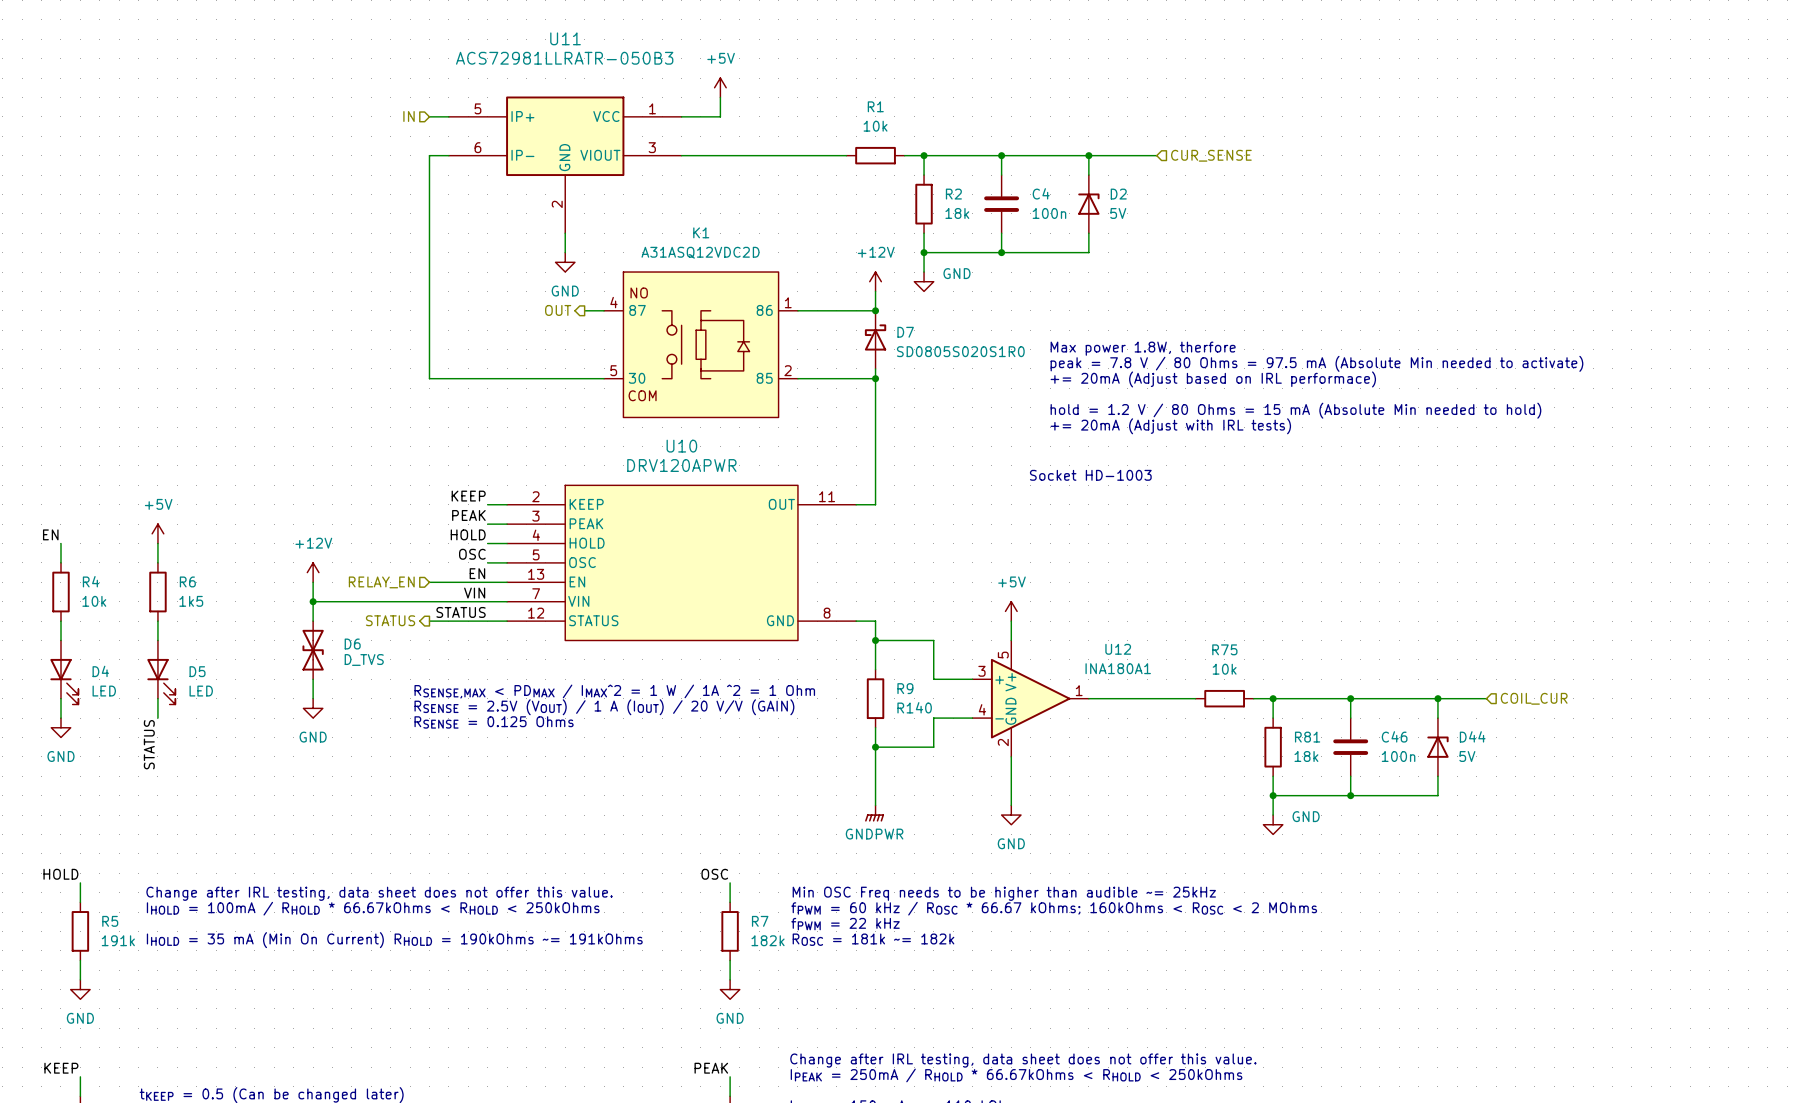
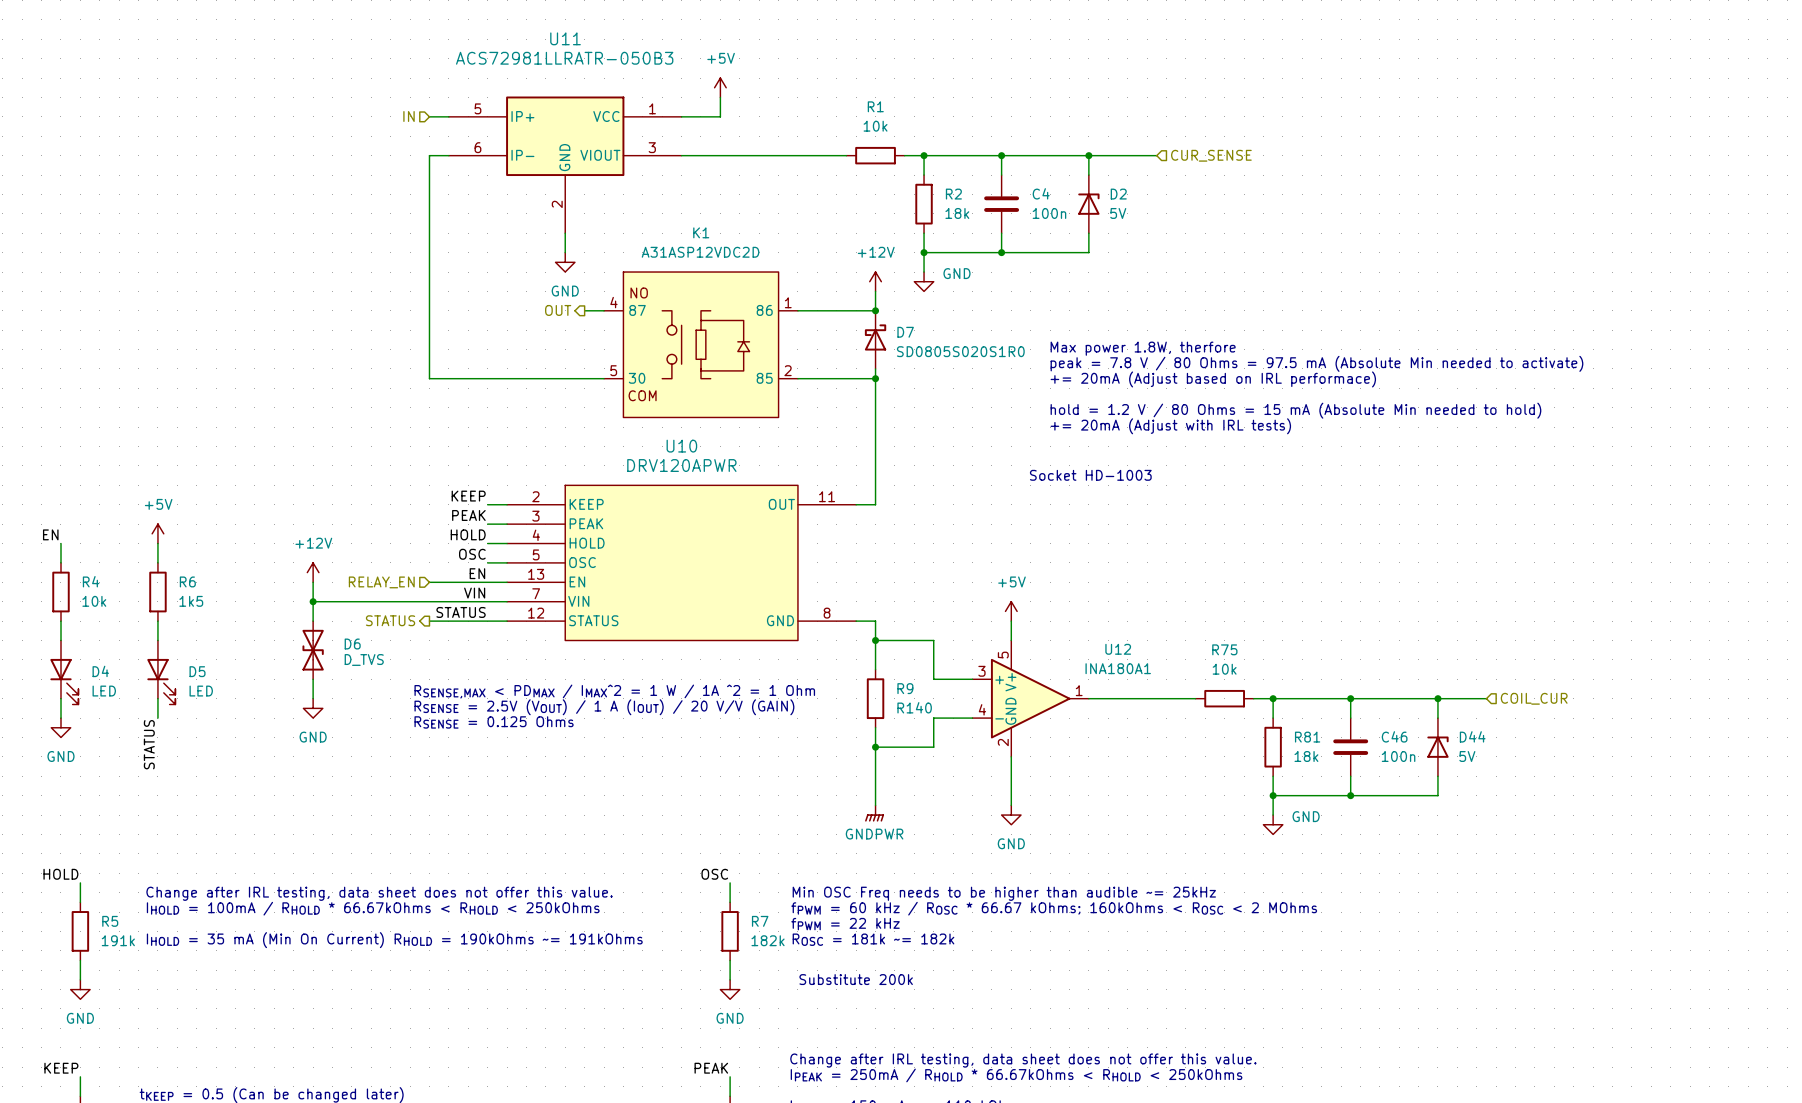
K1 value: A31ASQ12VDC2D (700, 252) -> A31ASP12VDC2D (700, 252)
text: none -> Substitute 200k (856, 979)

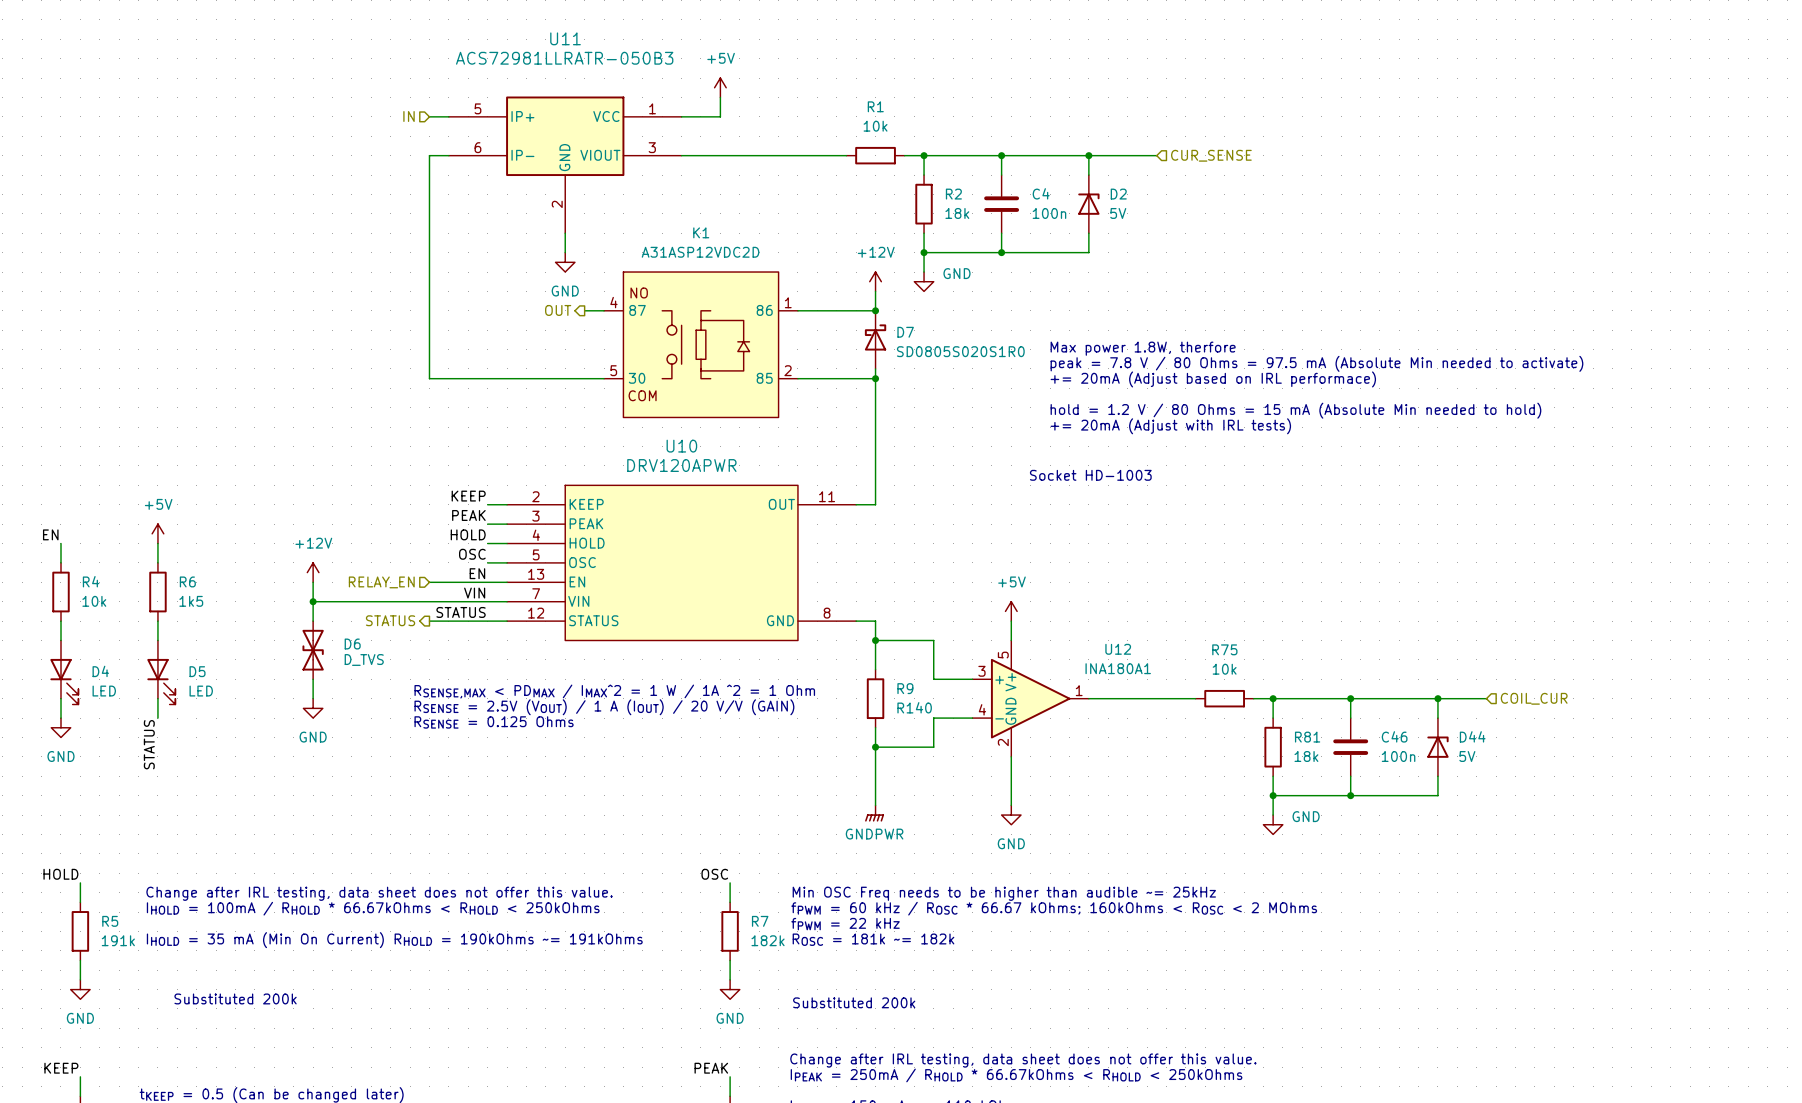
text: Substitute 200k (856, 979) -> none
text: none -> Substituted 200k (235, 998)
text: none -> Substituted 200k (854, 1002)

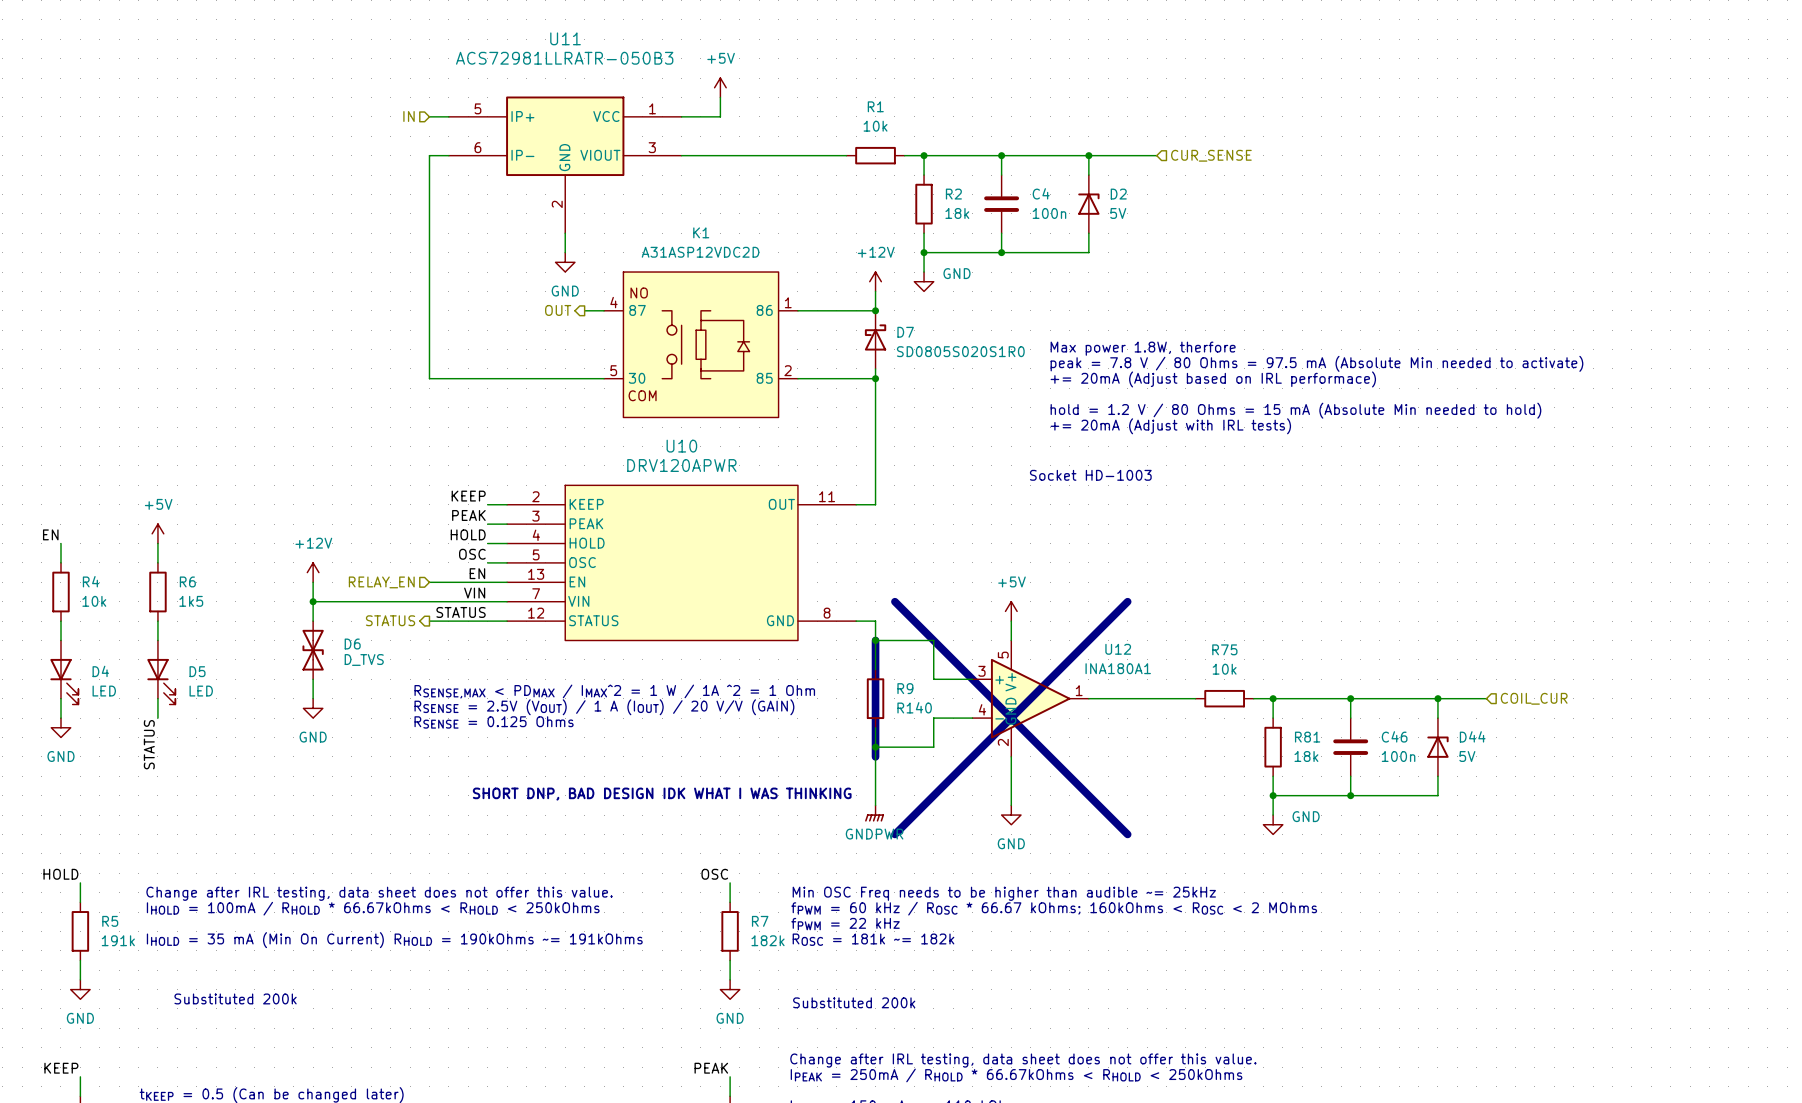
line: none -> (894, 601) (1127, 834)
line: none -> (1127, 601) (894, 834)
line: none -> (875, 640) (875, 756)
text: none -> SHORT DNP, BAD DESIGN IDK WHAT I WAS THINKING (662, 794)

